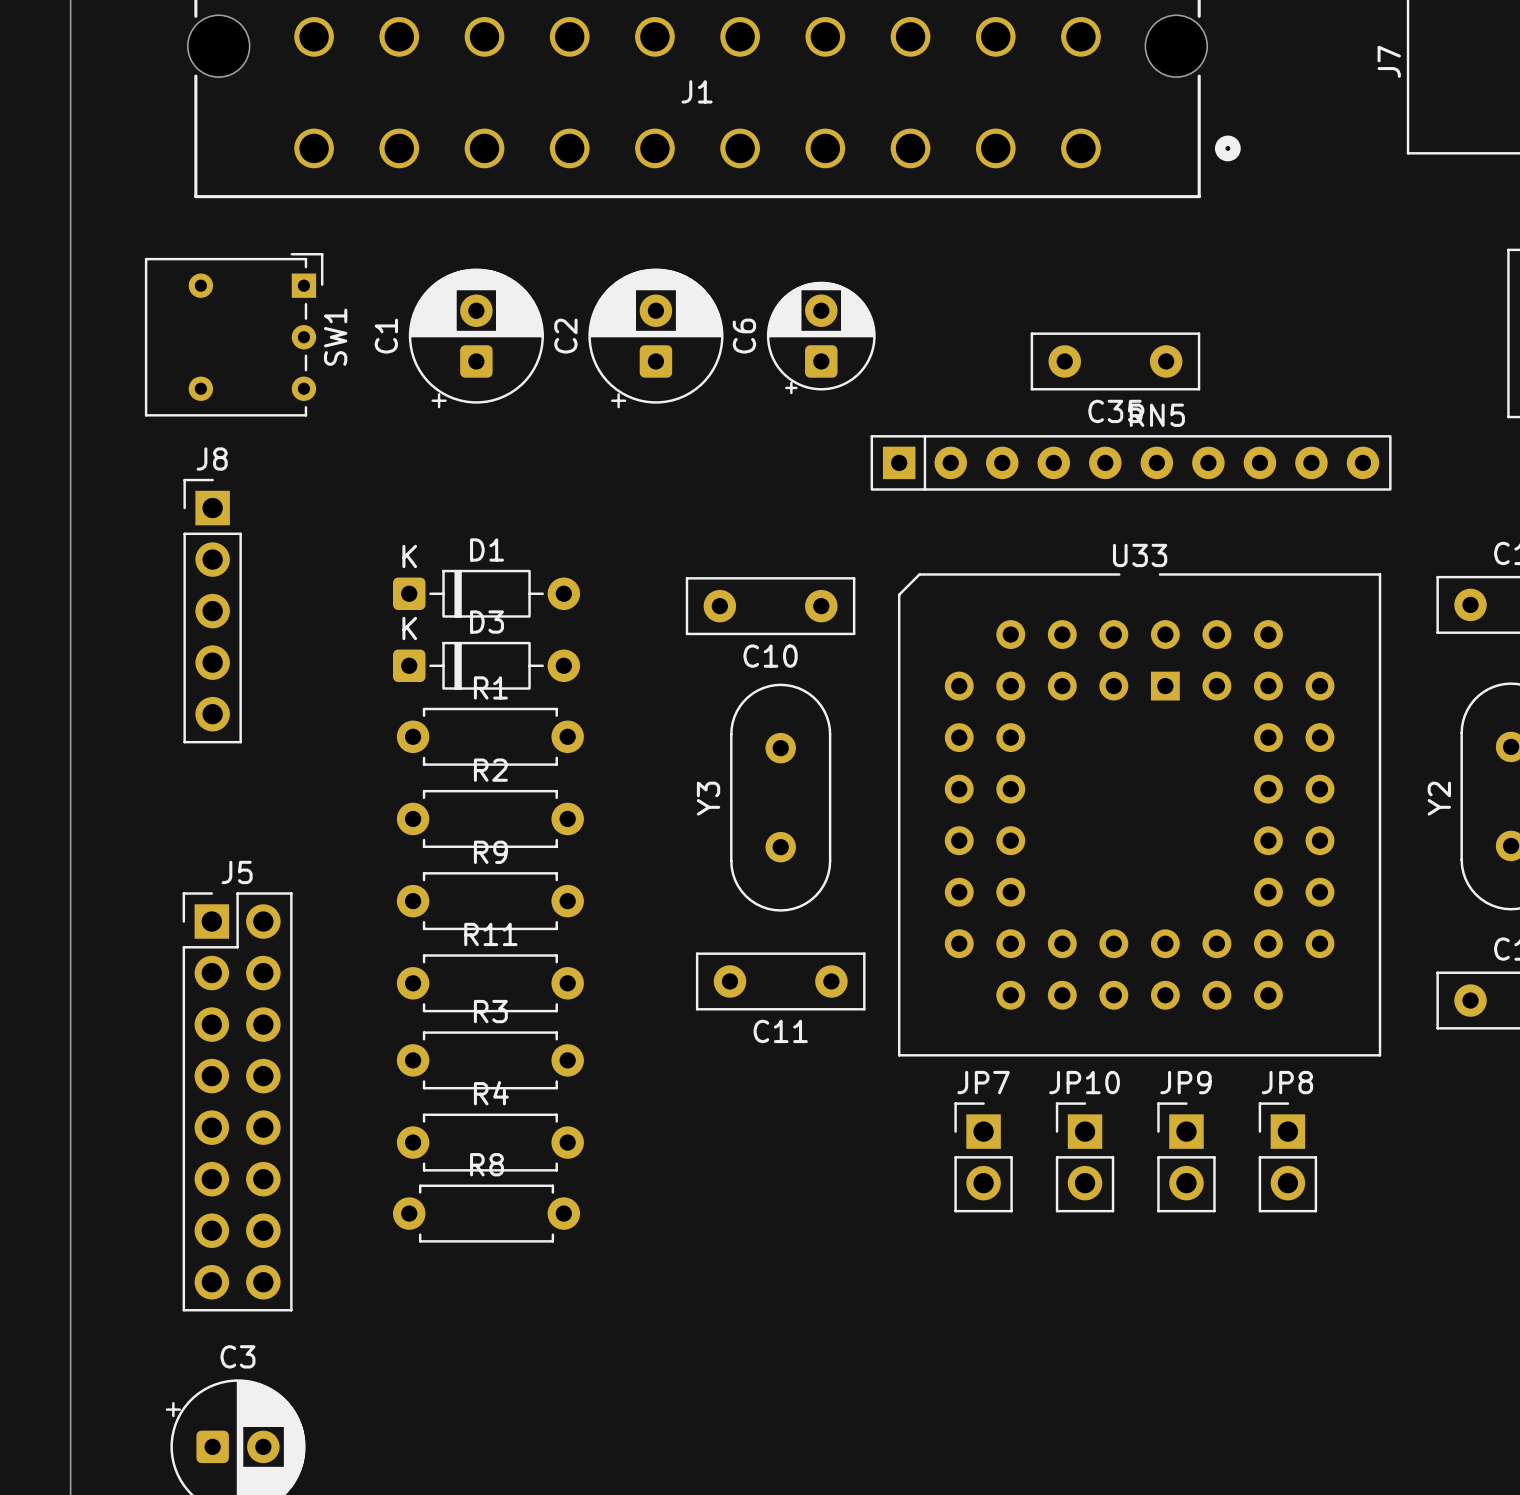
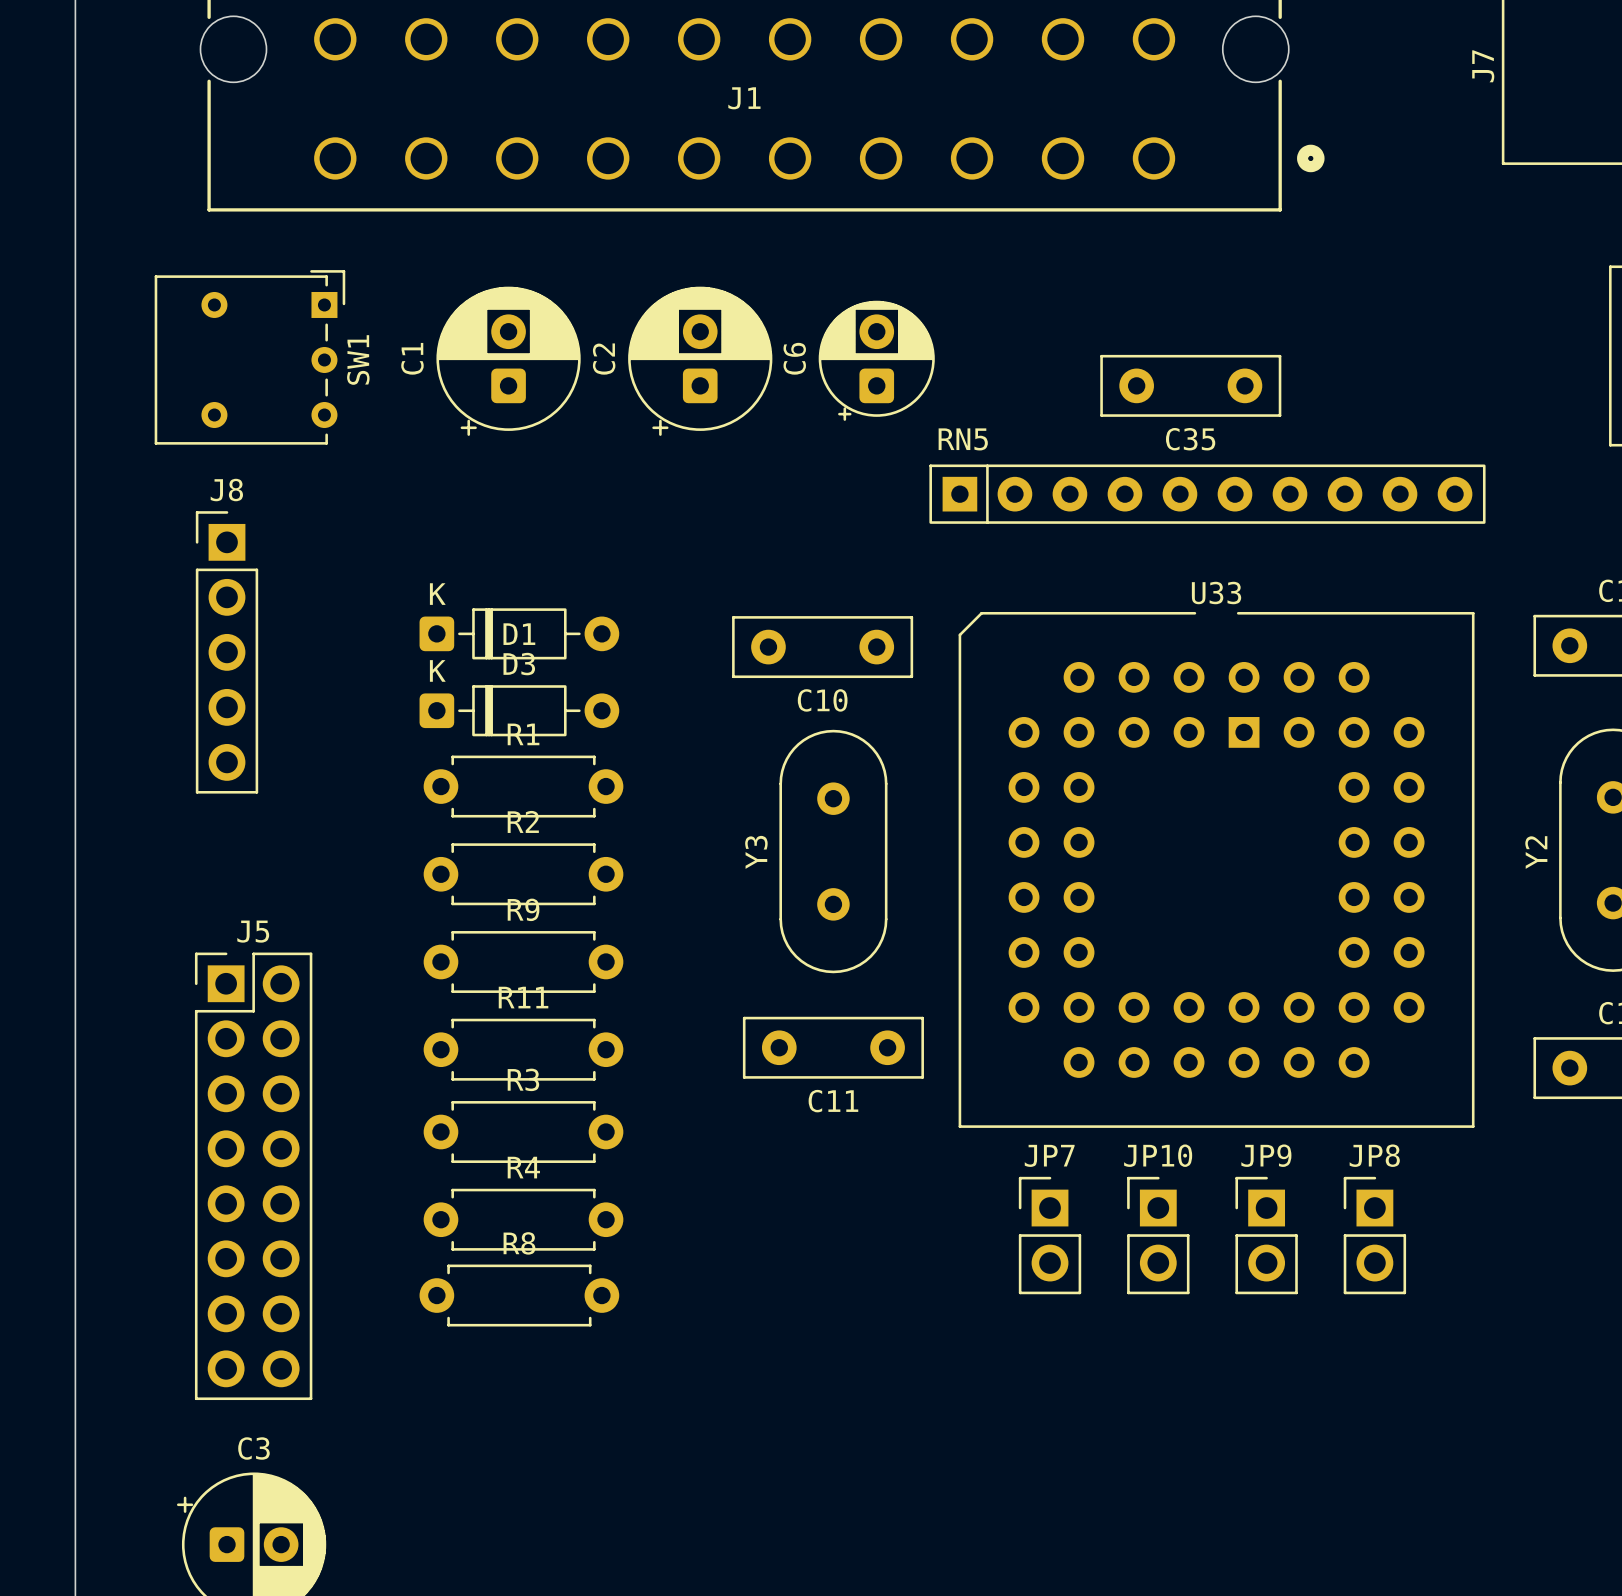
RN5 name position: RN5 (1157, 415) -> RN5 (963, 439)
D1 name position: D1 (487, 549) -> D1 (519, 634)

